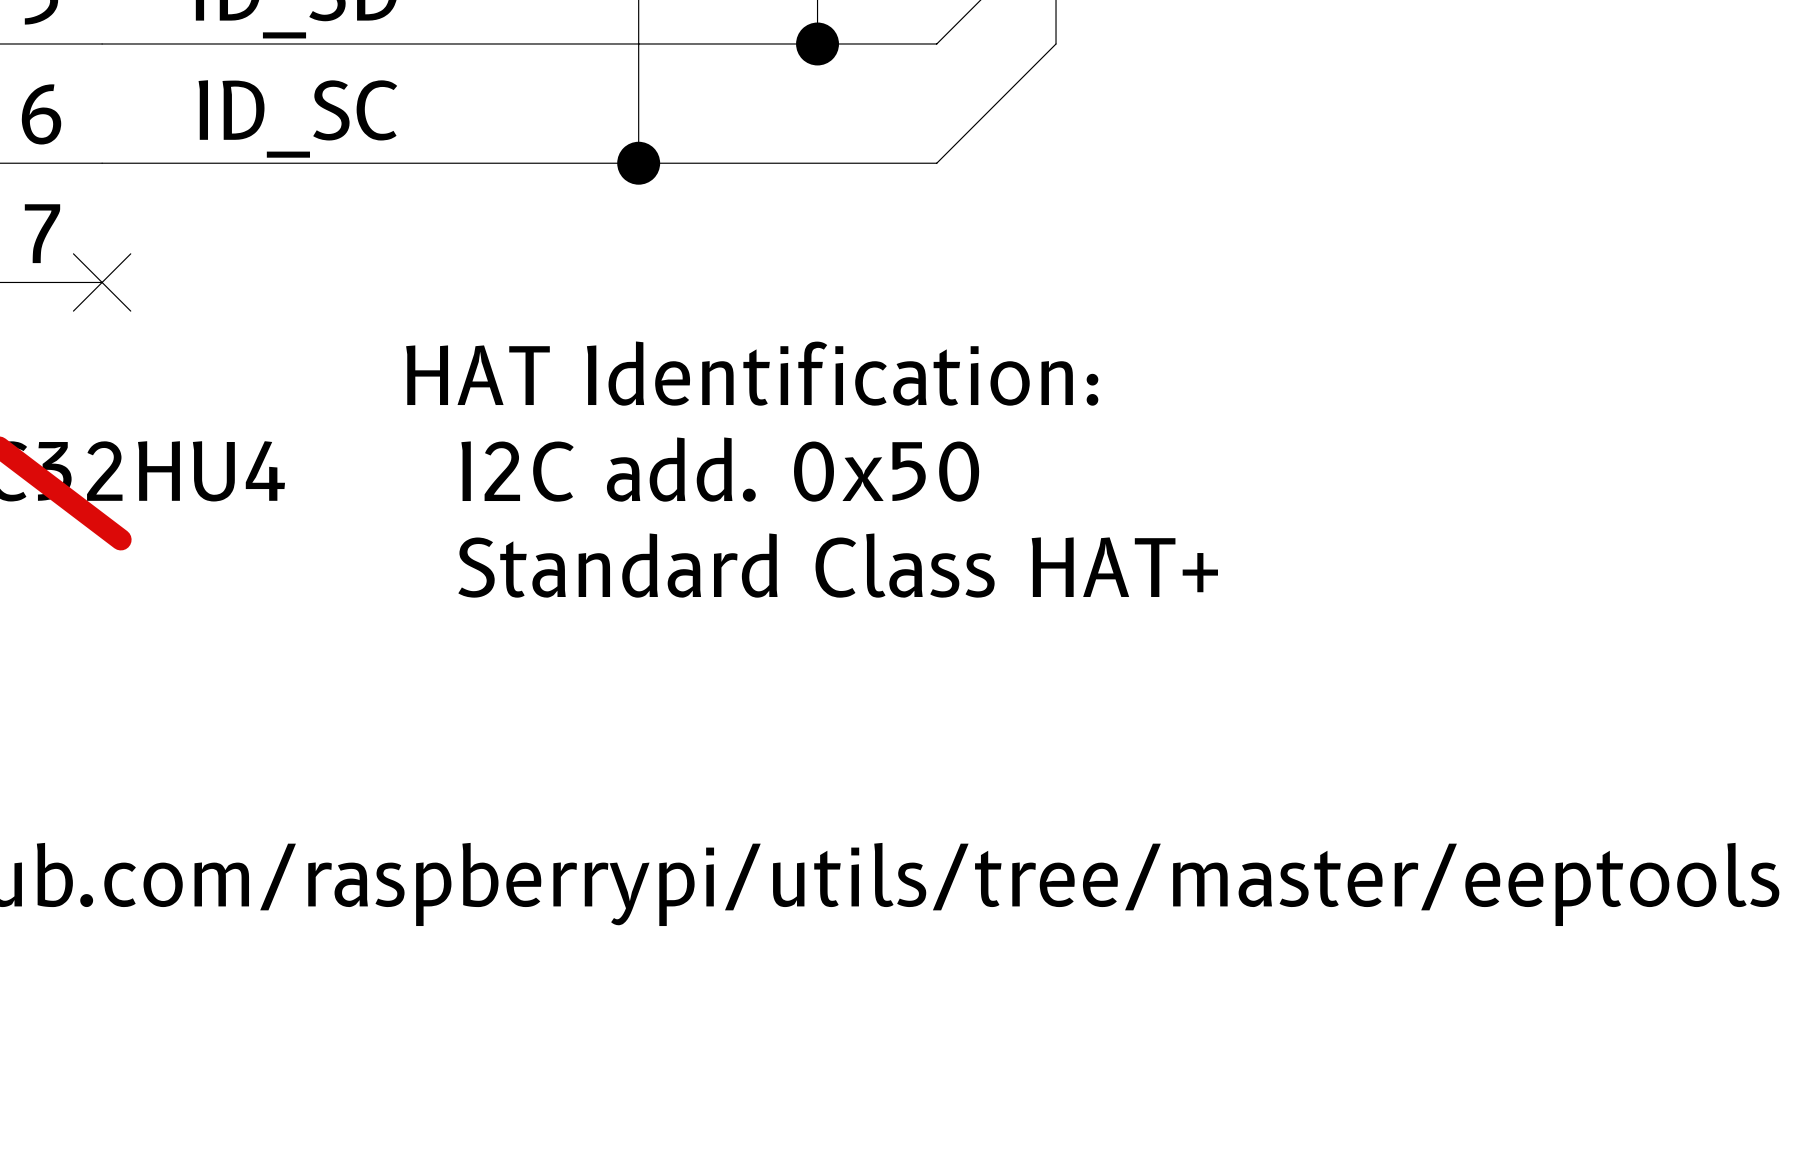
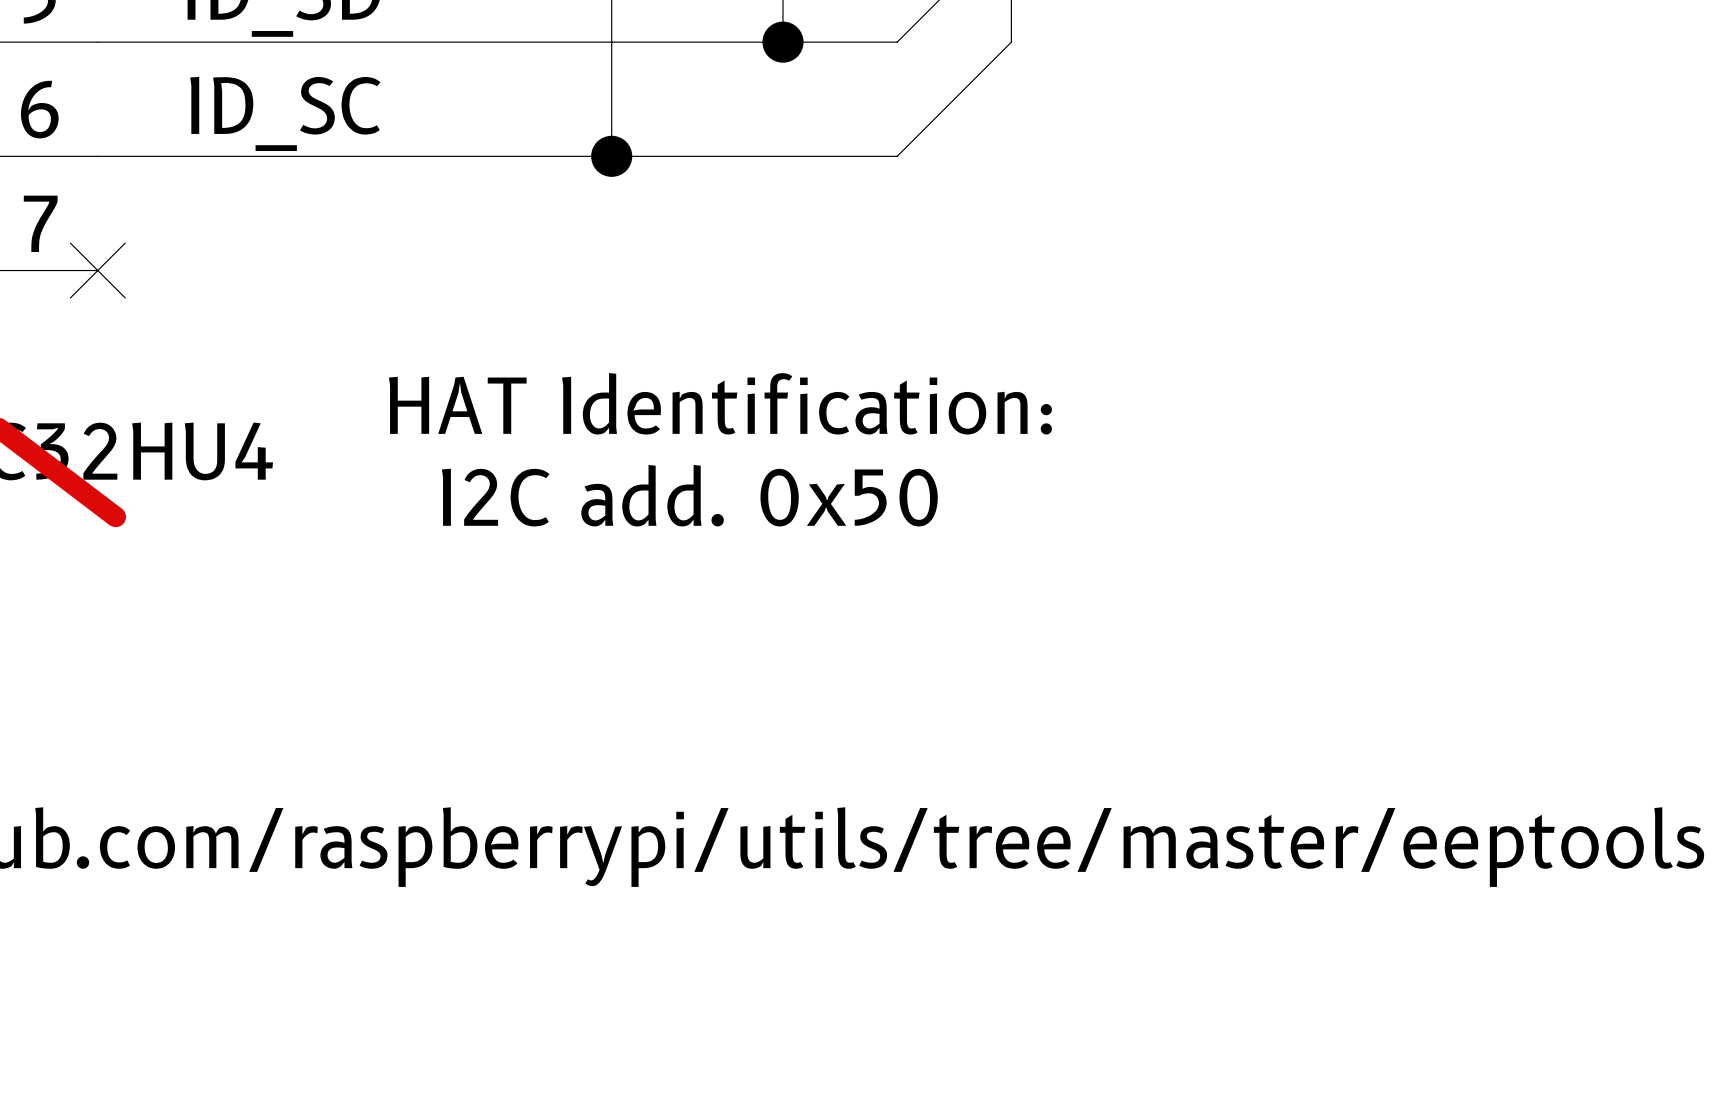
text position: HAT Identification: (752, 373) -> HAT Identification: (720, 403)
text position: I2C add. 0x50 (720, 469) -> I2C add. 0x50 (689, 495)
text: Standard Class HAT+ (838, 565) -> none

